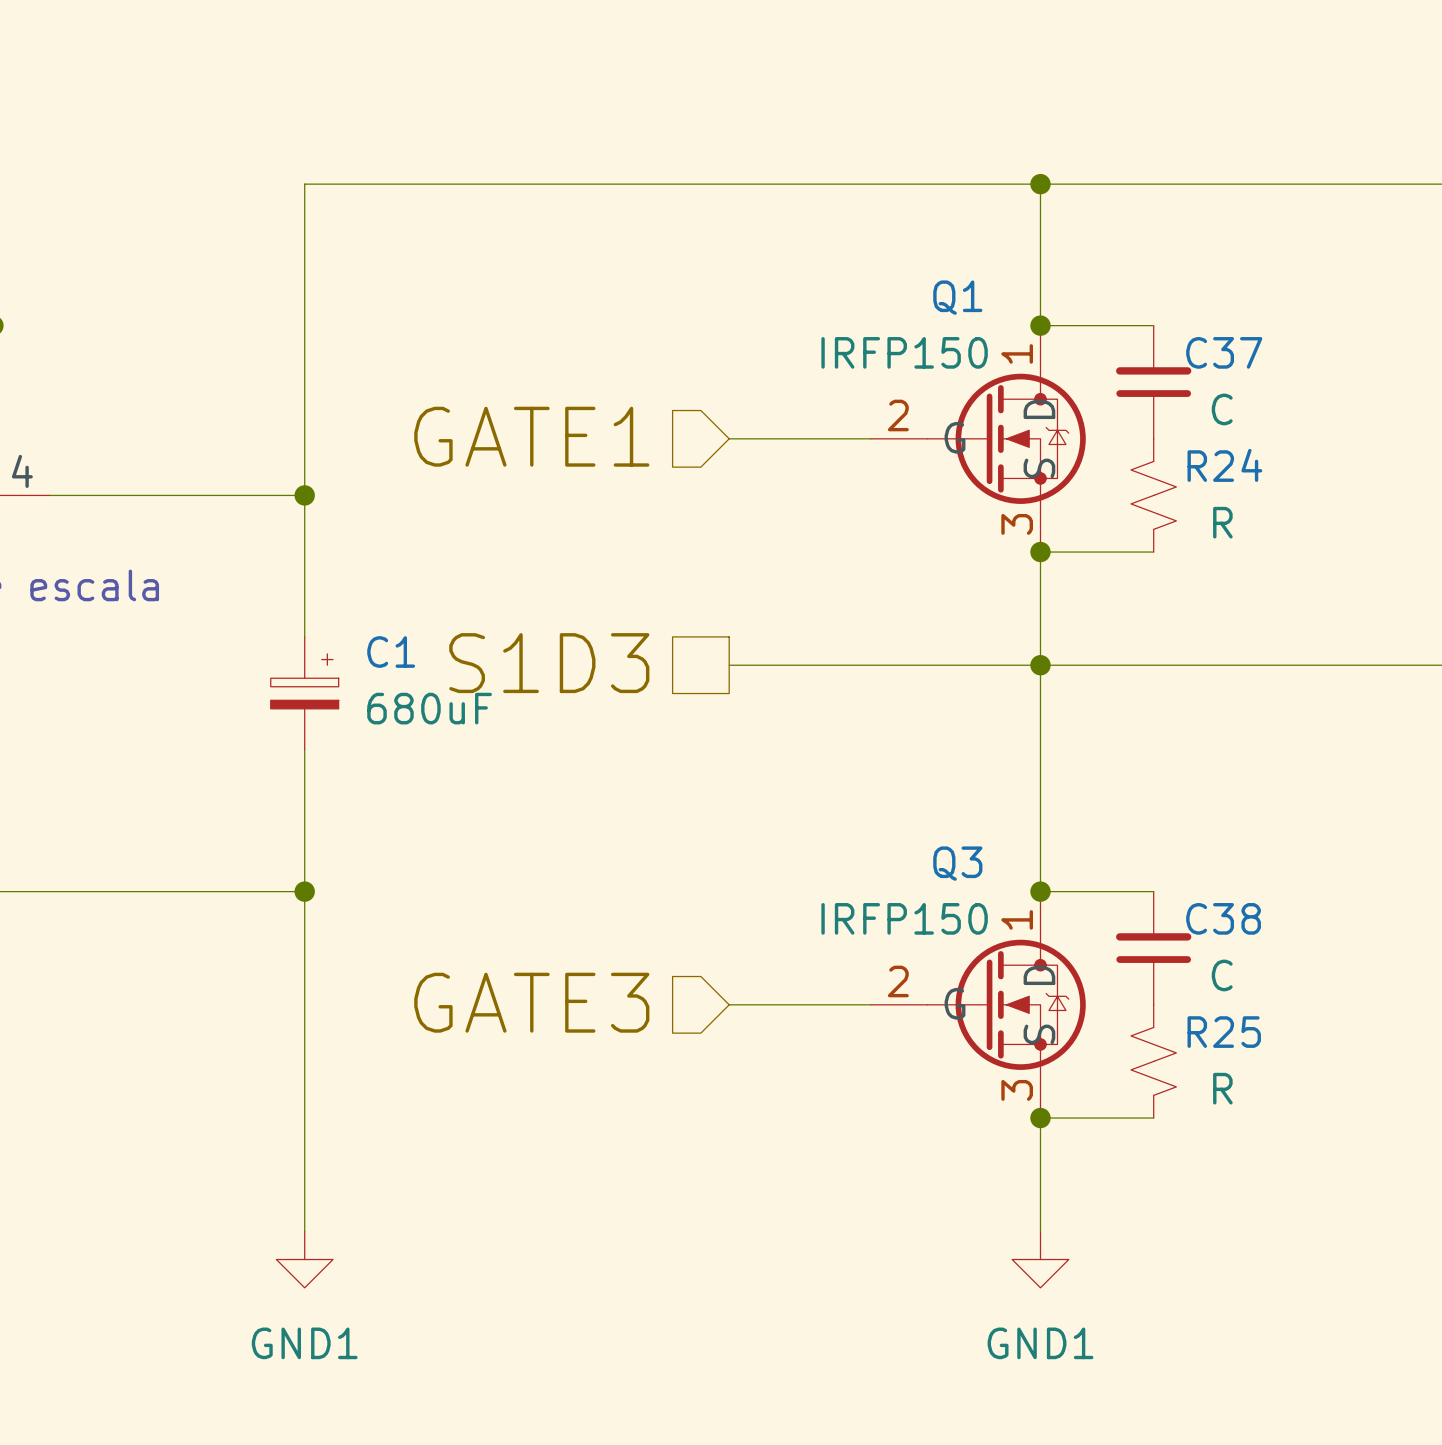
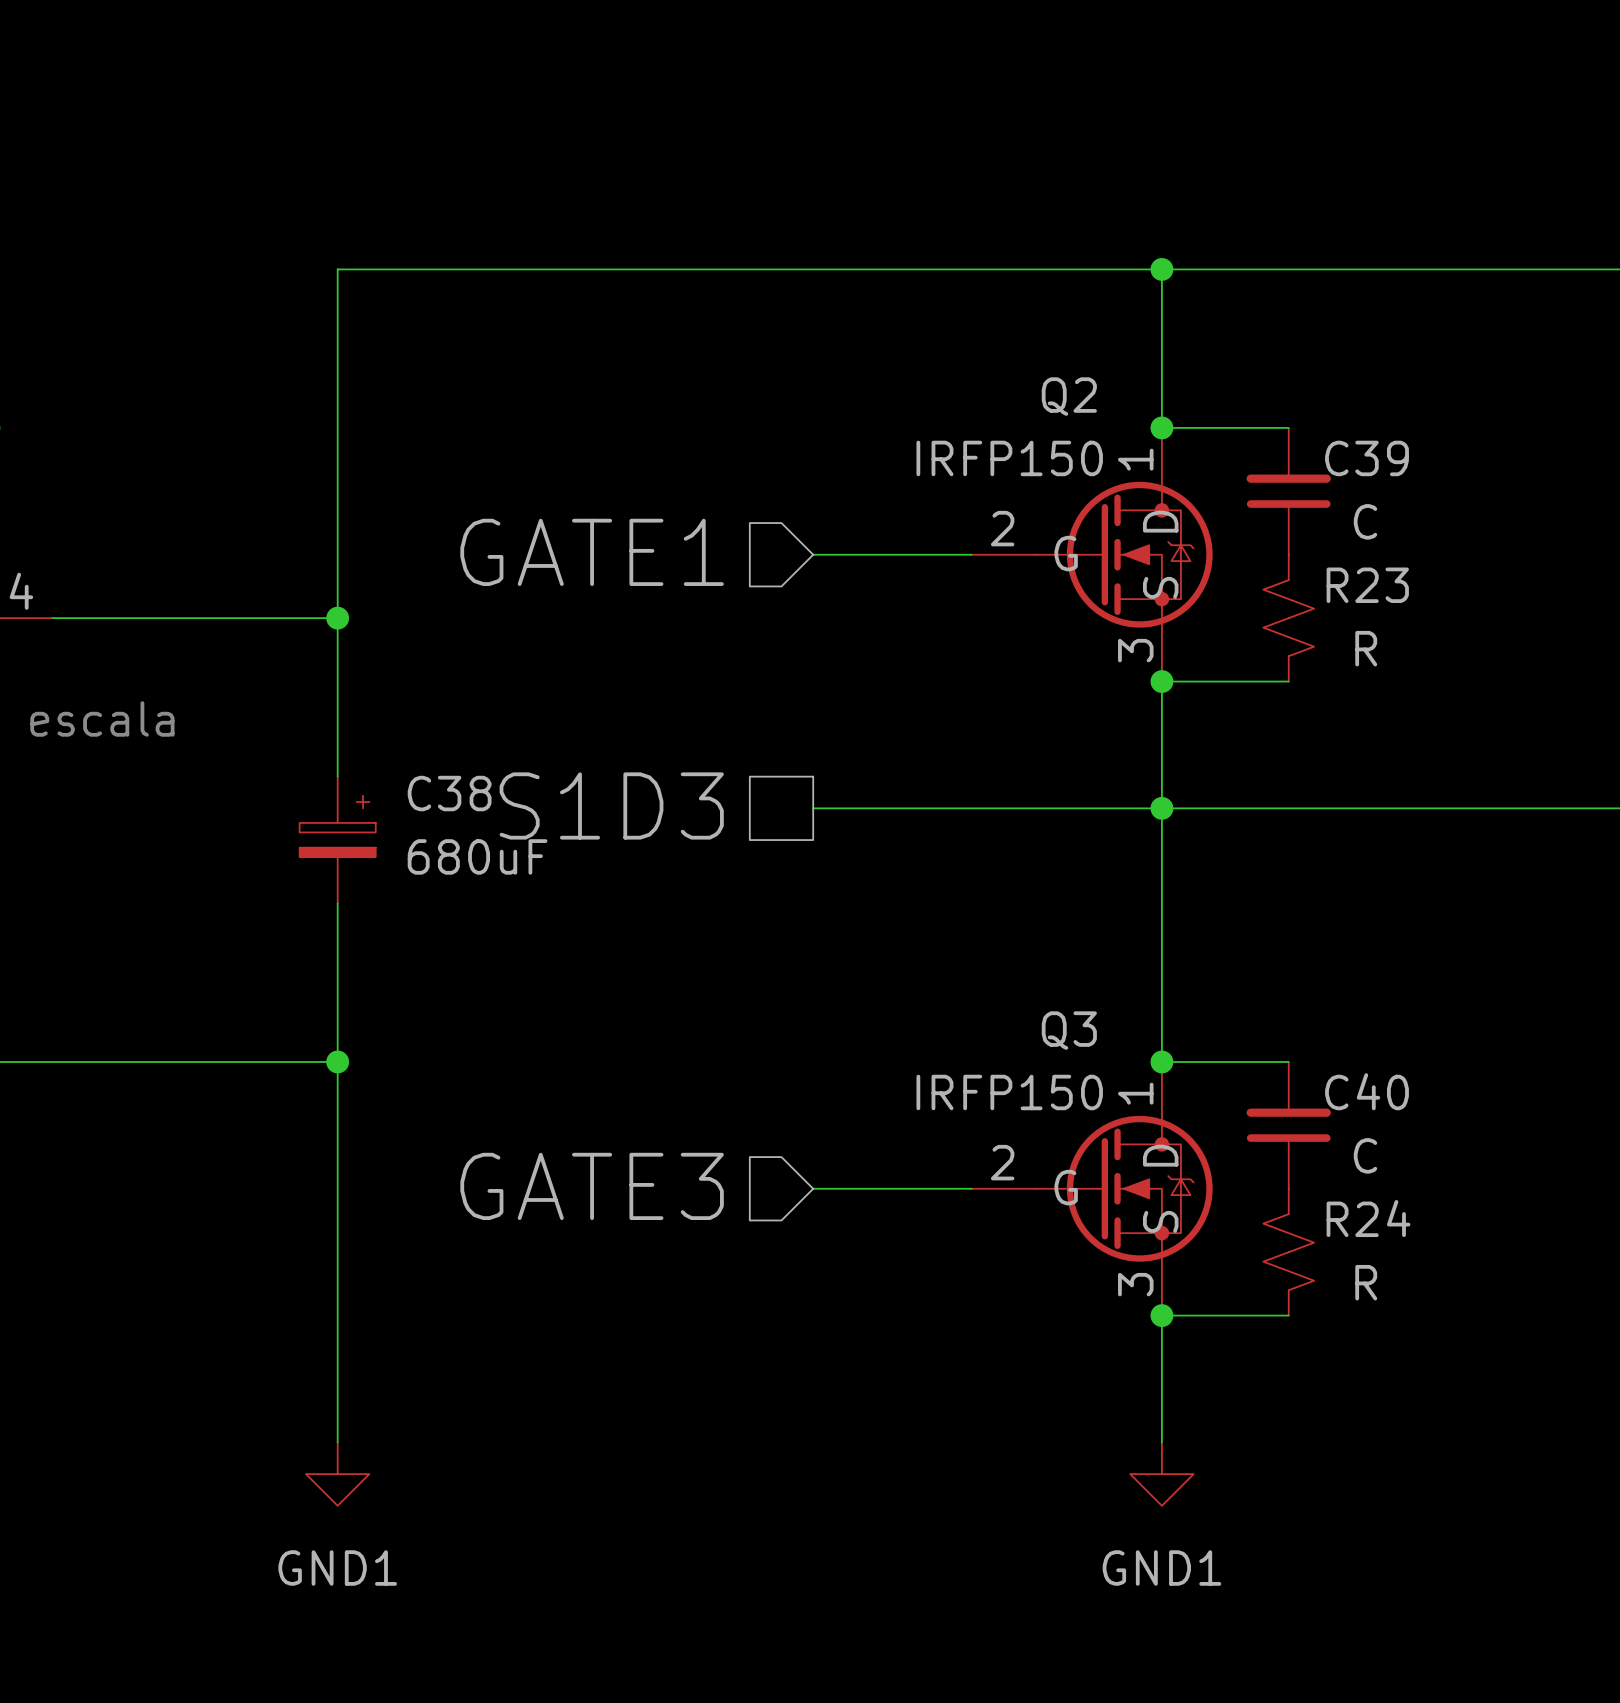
Q1 name: Q1 (957, 297) -> Q2 (1069, 396)
C37 name: C37 (1224, 352) -> C39 (1366, 458)
R24 name: R24 (1224, 465) -> R23 (1367, 585)
C1 name: C1 (391, 652) -> C38 (449, 793)
C38 name: C38 (1223, 918) -> C40 (1366, 1091)
R25 name: R25 (1224, 1032) -> R24 (1368, 1218)

